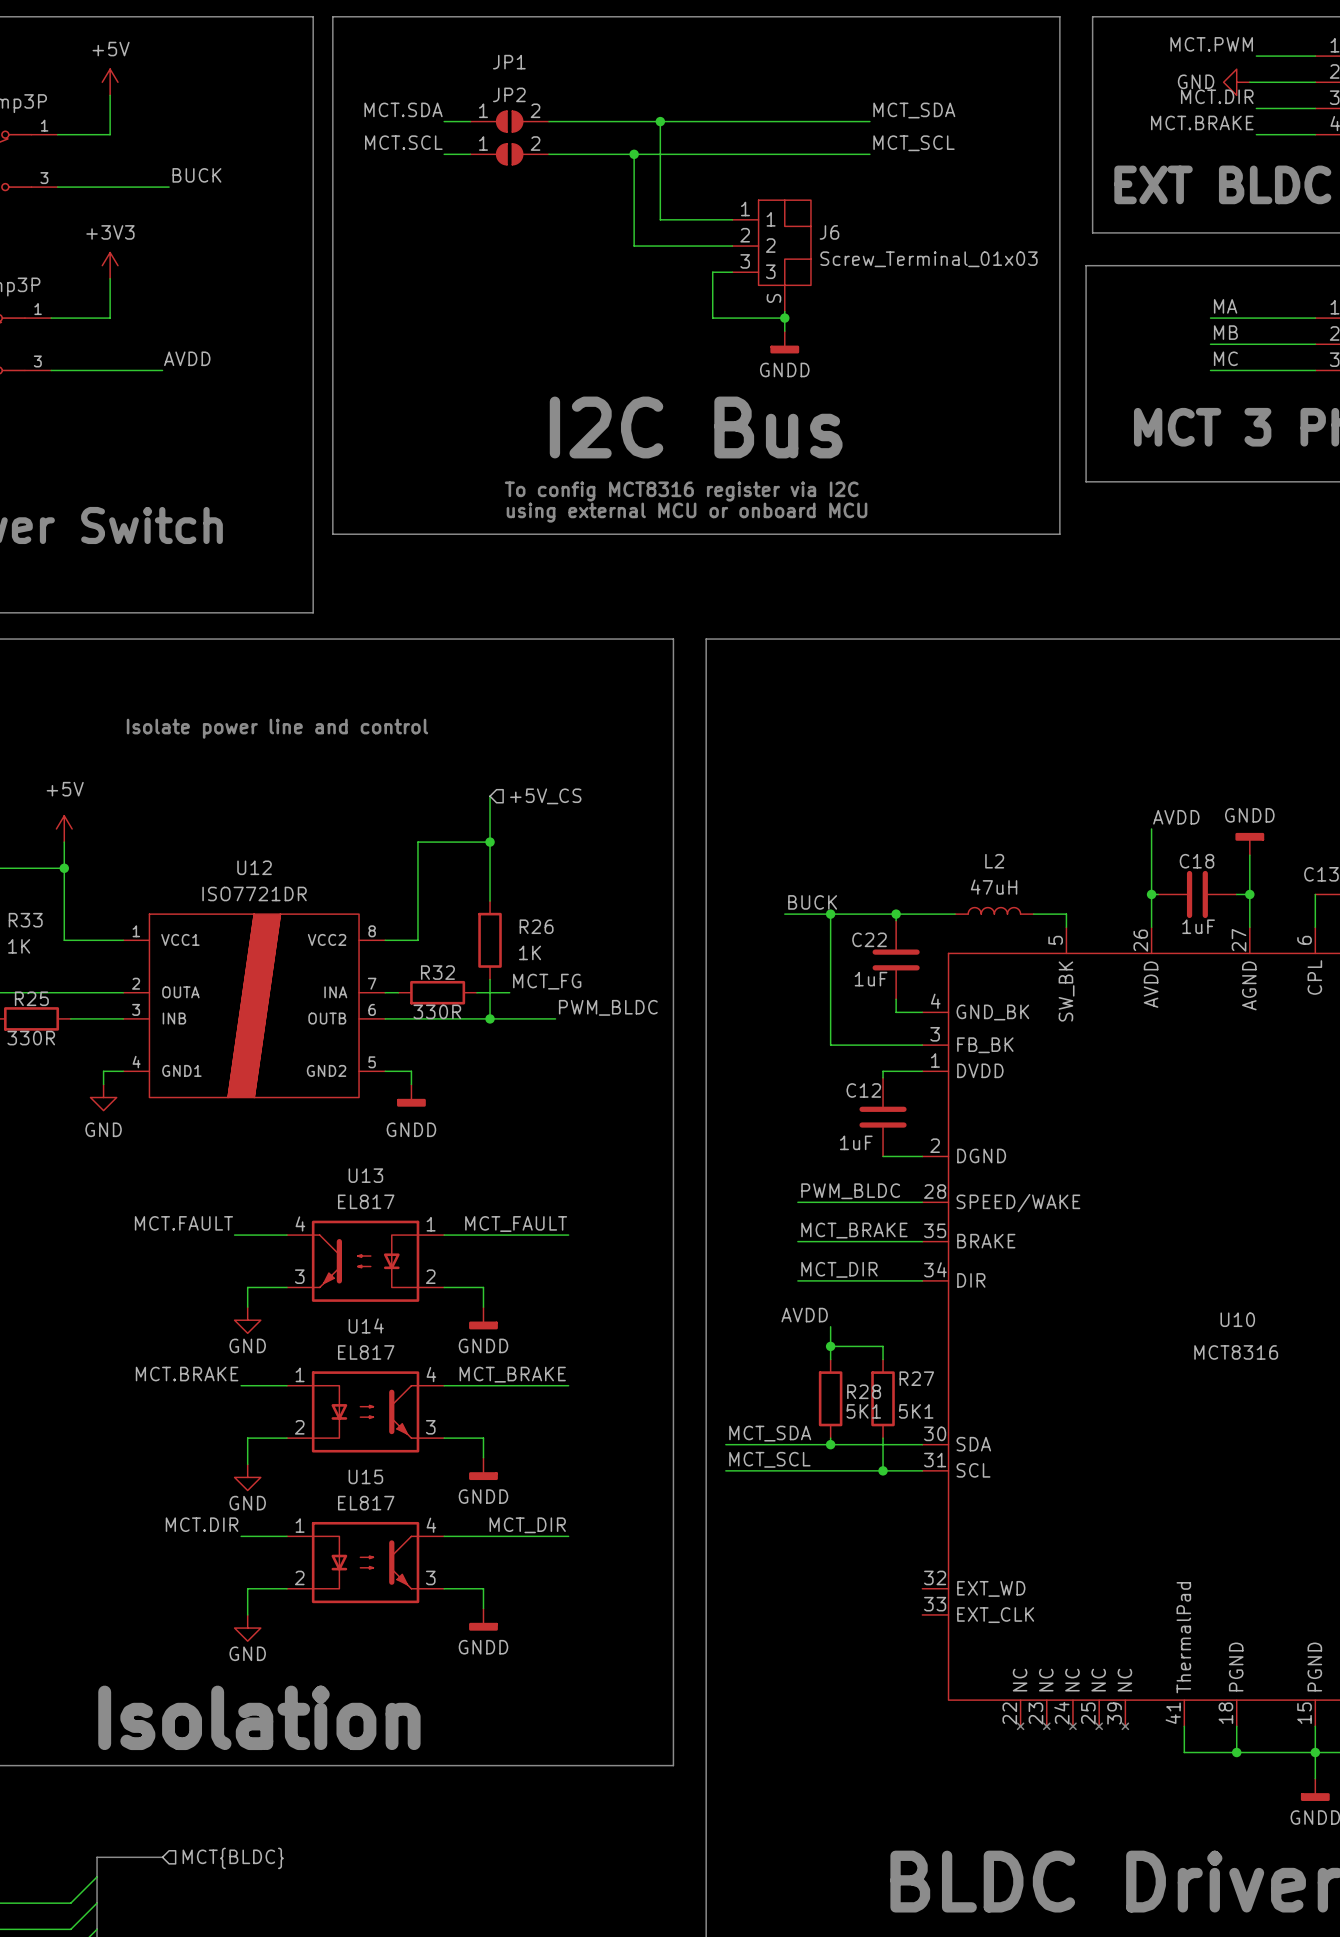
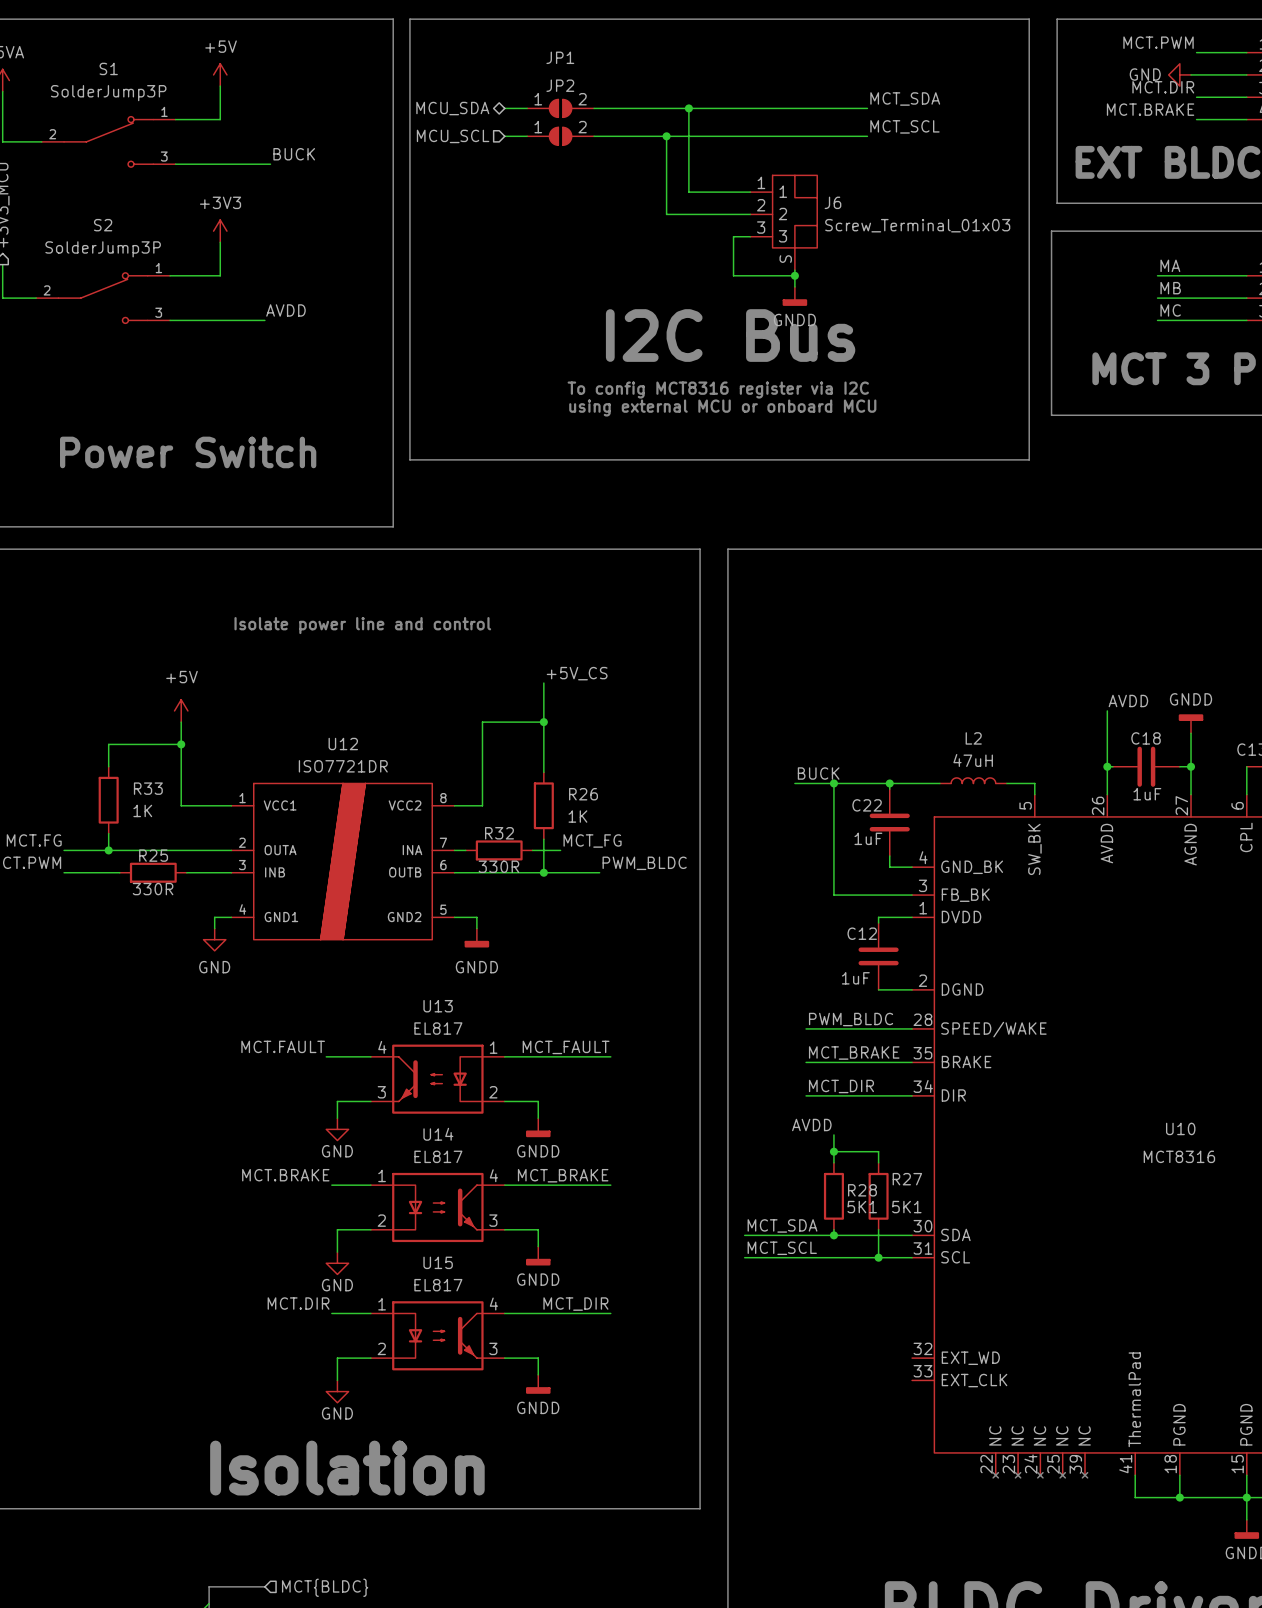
label: MCT.SDA (403, 109) -> none
hierarchical label: none -> MCU_SDA (452, 108)
label: MCT.SCL (403, 142) -> none
hierarchical label: none -> MCU_SCL (453, 136)
text position: I2C Bus (696, 427) -> I2C Bus (730, 335)
text position: To config MCT8316 register via I2C (681, 491) -> To config MCT8316 register via I2C (718, 390)
text position: using external MCU or onboard MCU (687, 512) -> using external MCU or onboard MCU (722, 407)
label: none -> +5V_CS (577, 673)
hierarchical label: +5V_CS (545, 796) -> none

